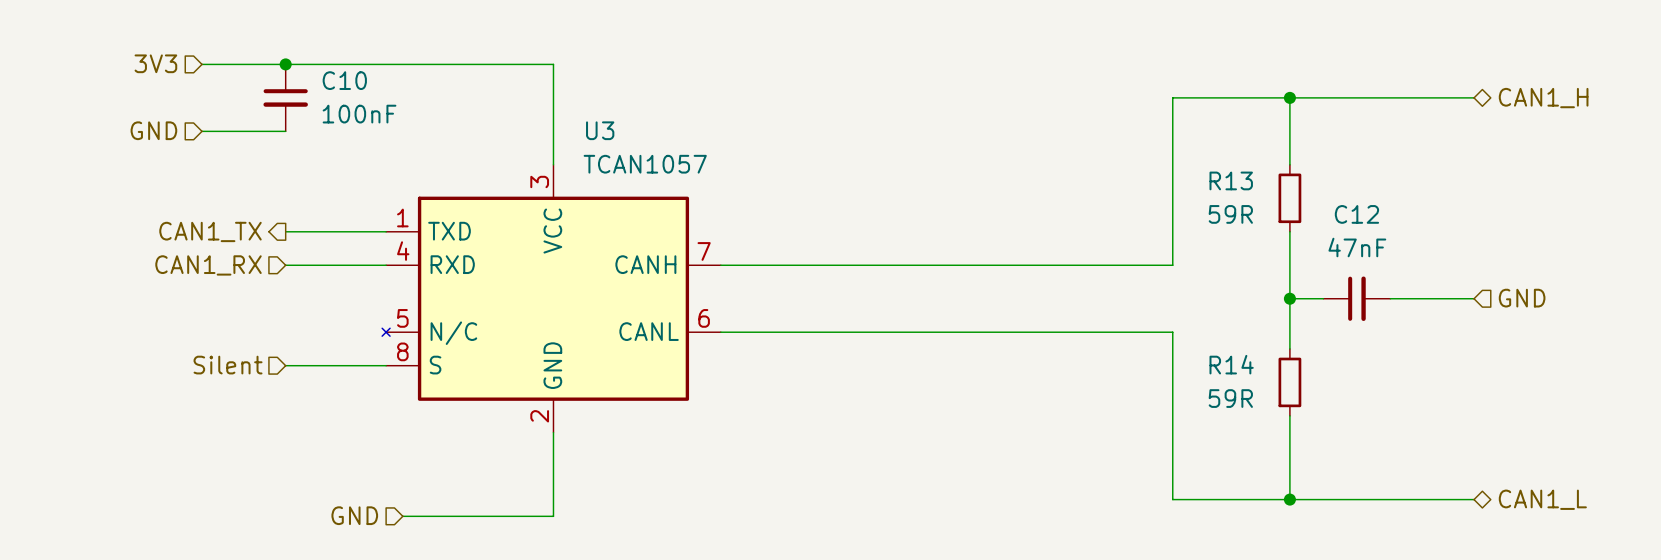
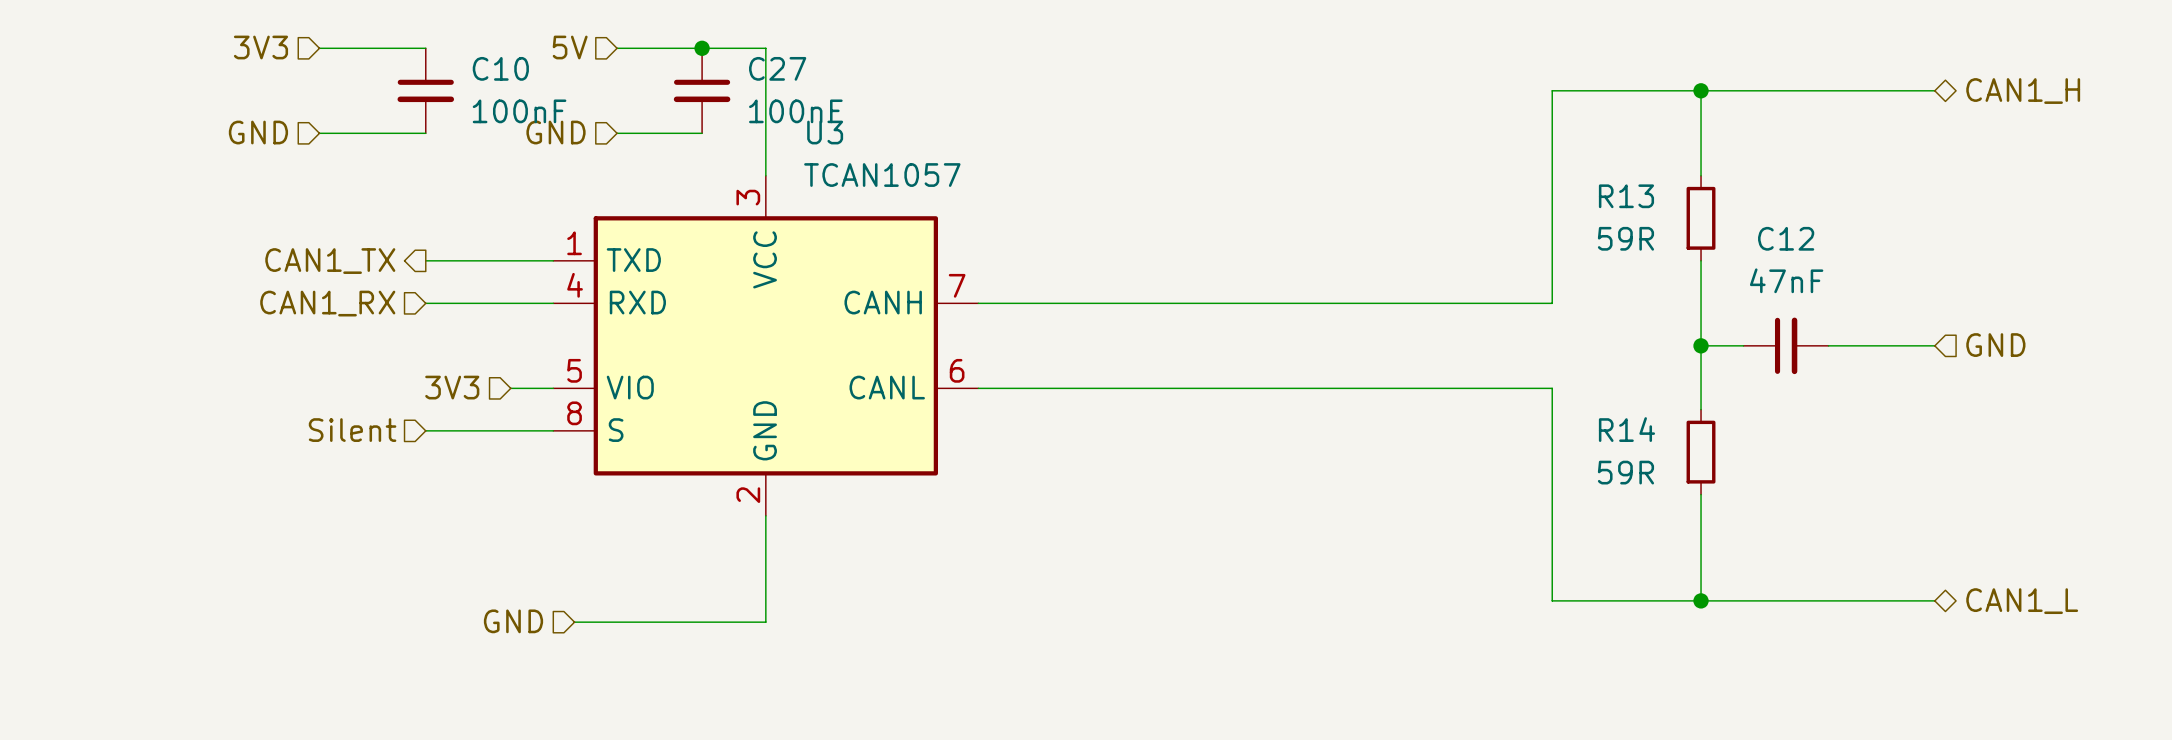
hierarchical label: none -> 5V (570, 47)
wire: (285, 64) (436, 64) -> none
junction: (285, 64) -> none
junction: none -> (702, 48)
C27: none -> 100nF (702, 90)
hierarchical label: none -> GND (556, 132)
wire: none -> (617, 133) (702, 133)
U3 symbol: [382, 164, 721, 433] -> [553, 175, 979, 516]
hierarchical label: none -> 3V3 (452, 387)
wire: none -> (510, 388) (553, 388)

